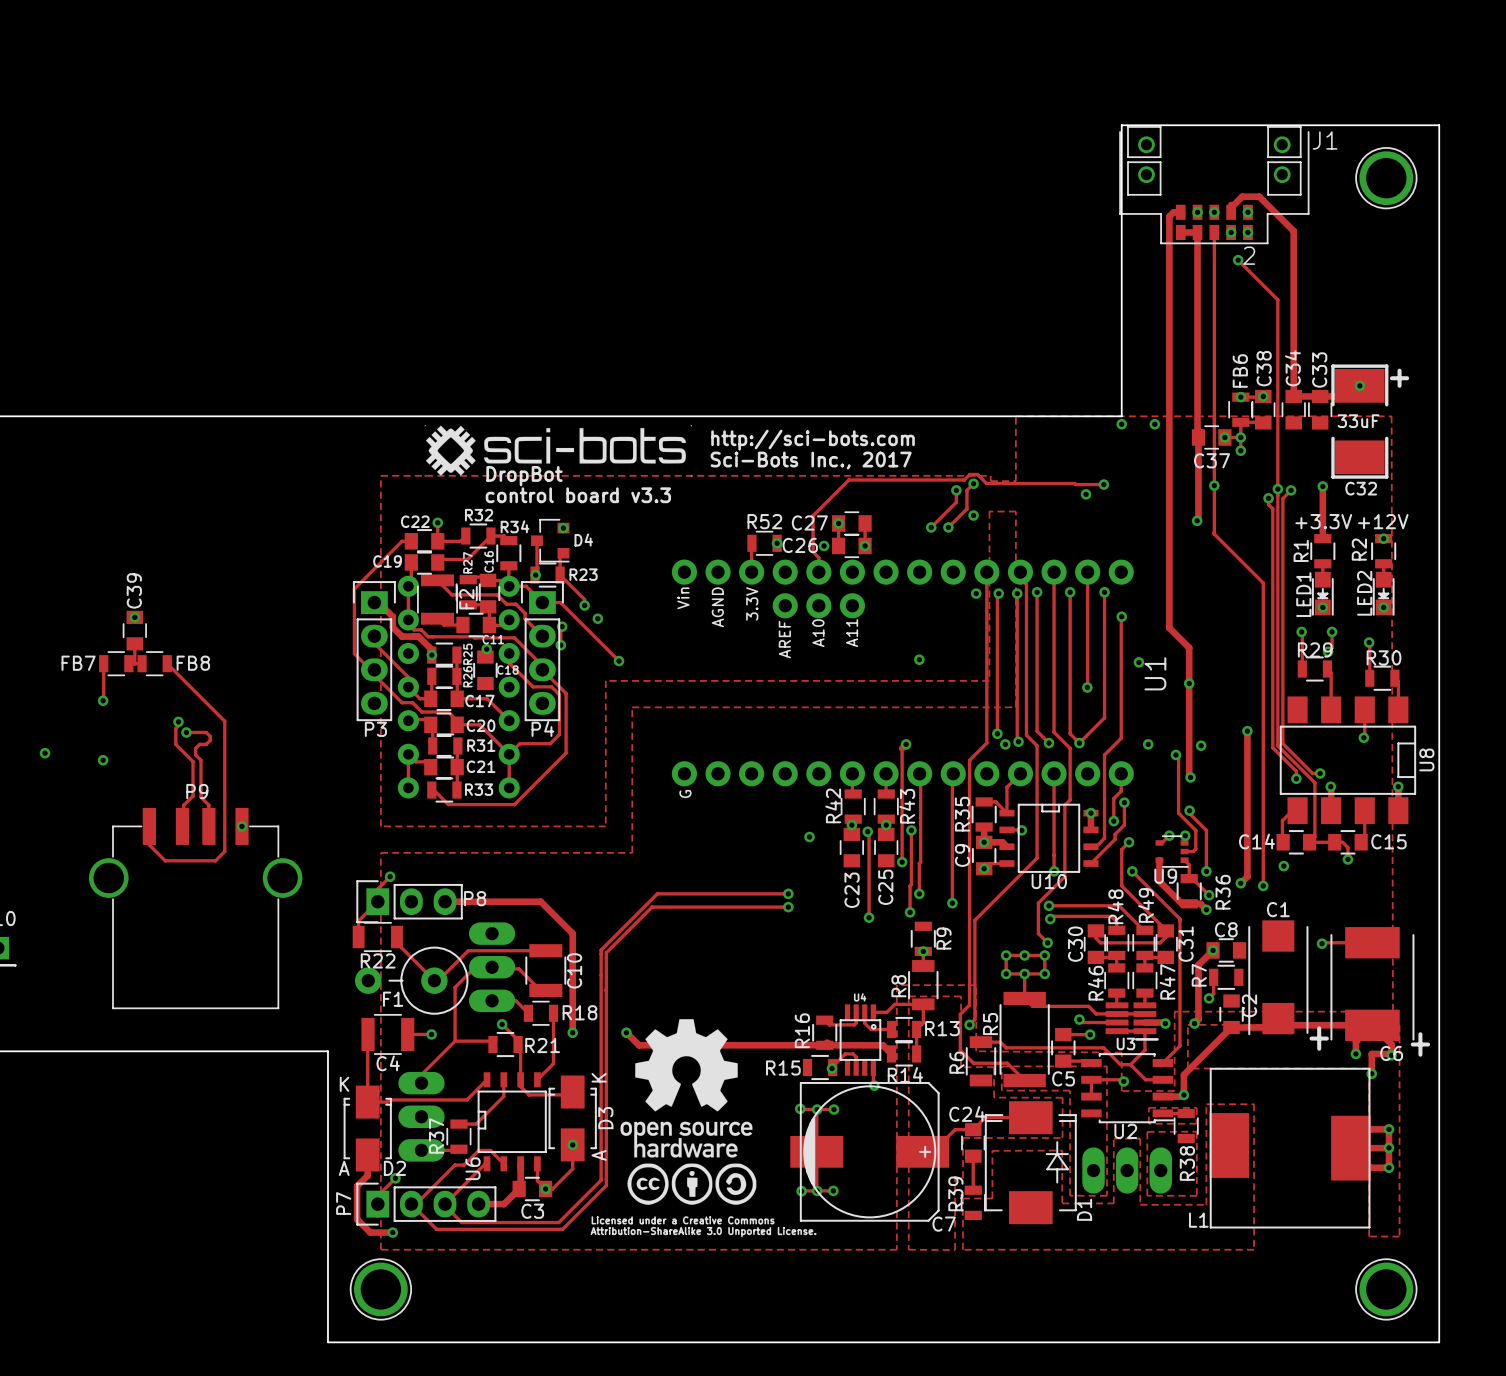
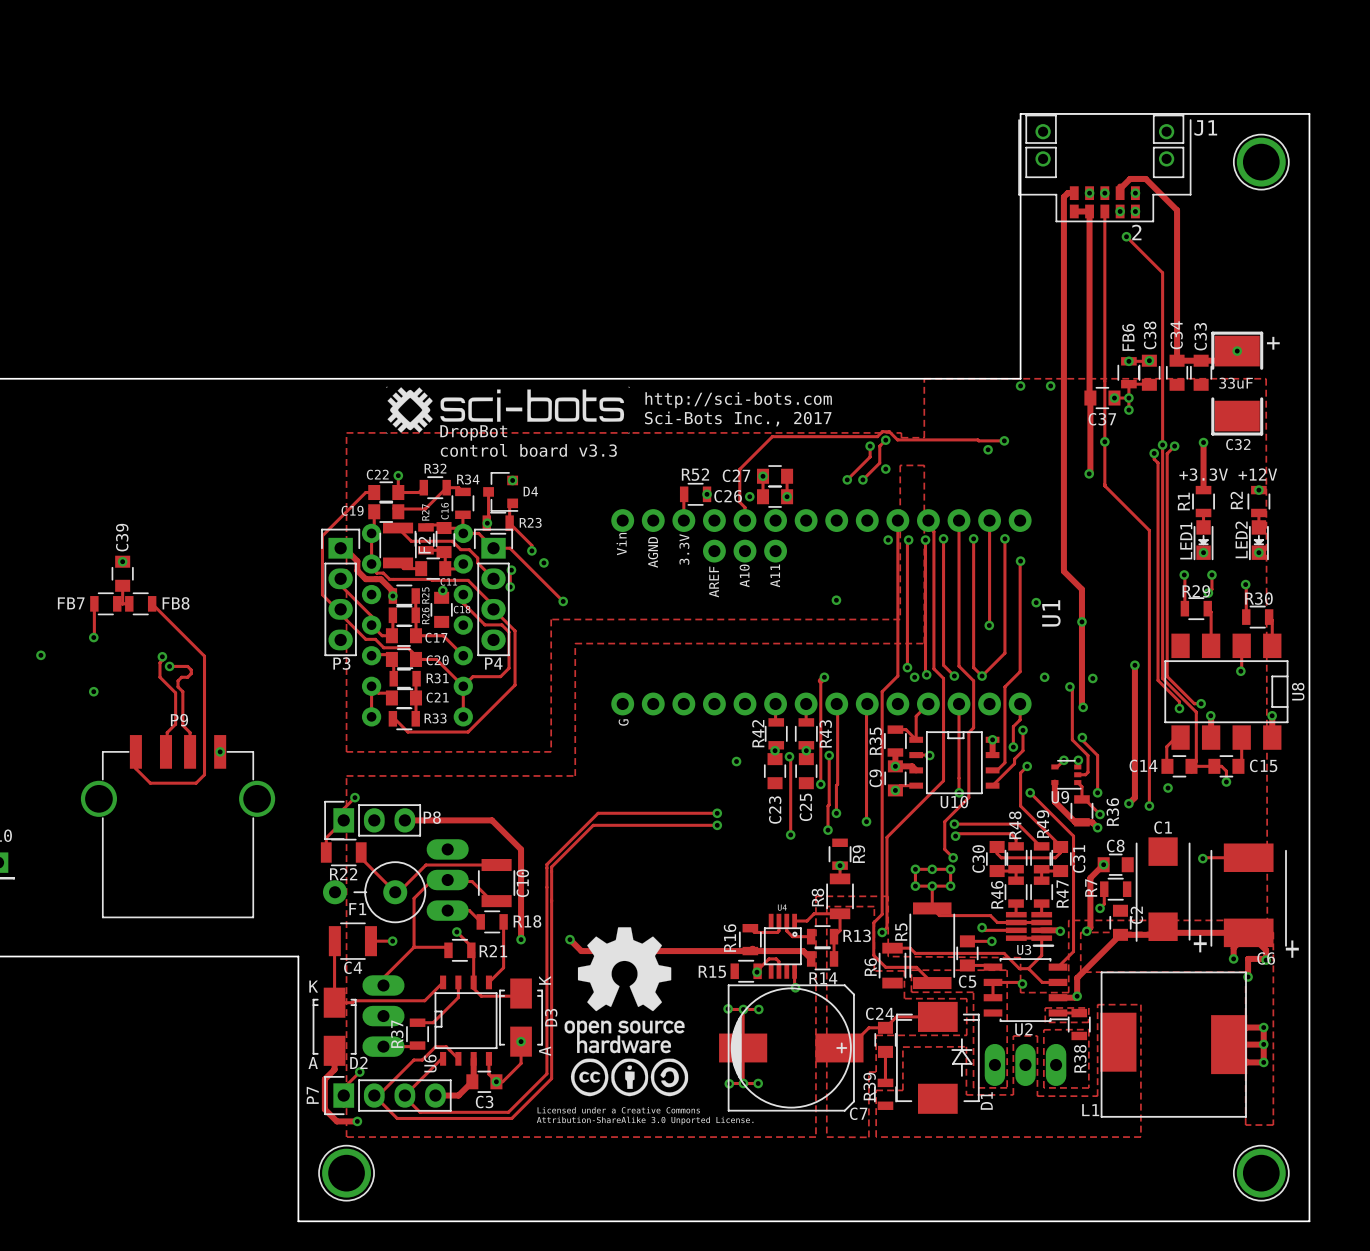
via position: (45, 753) -> (40, 655)

